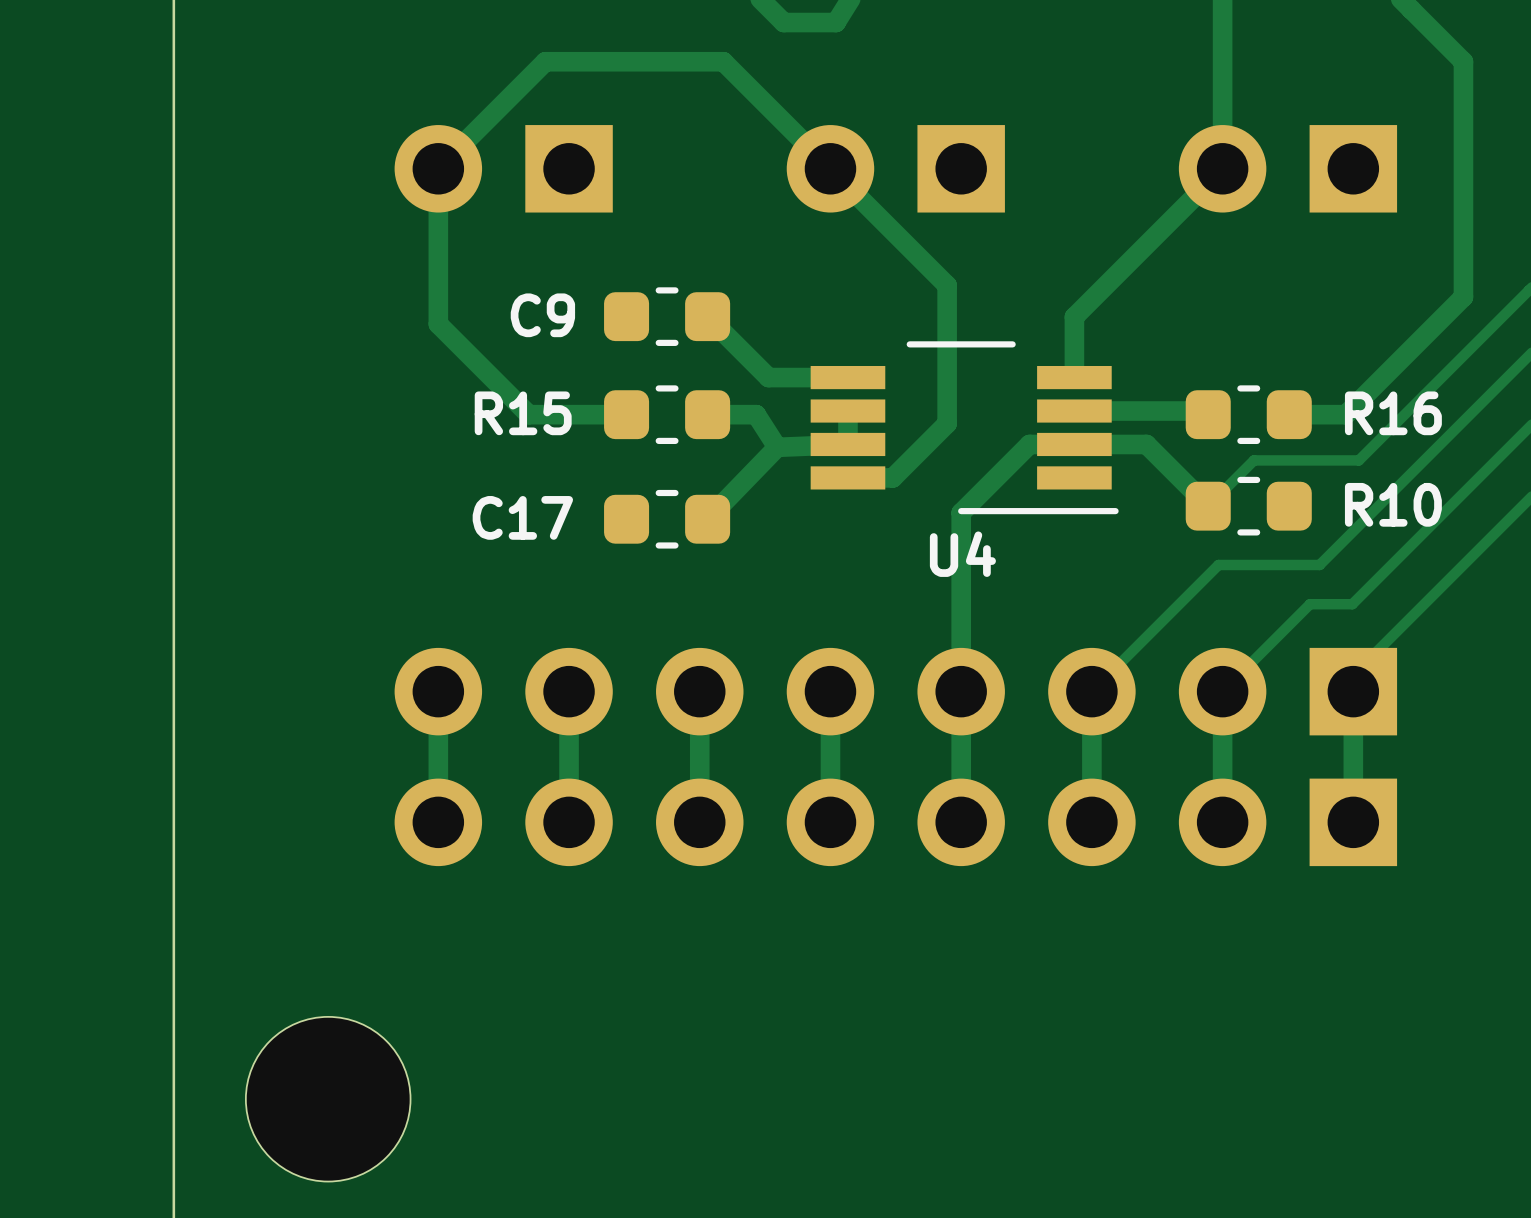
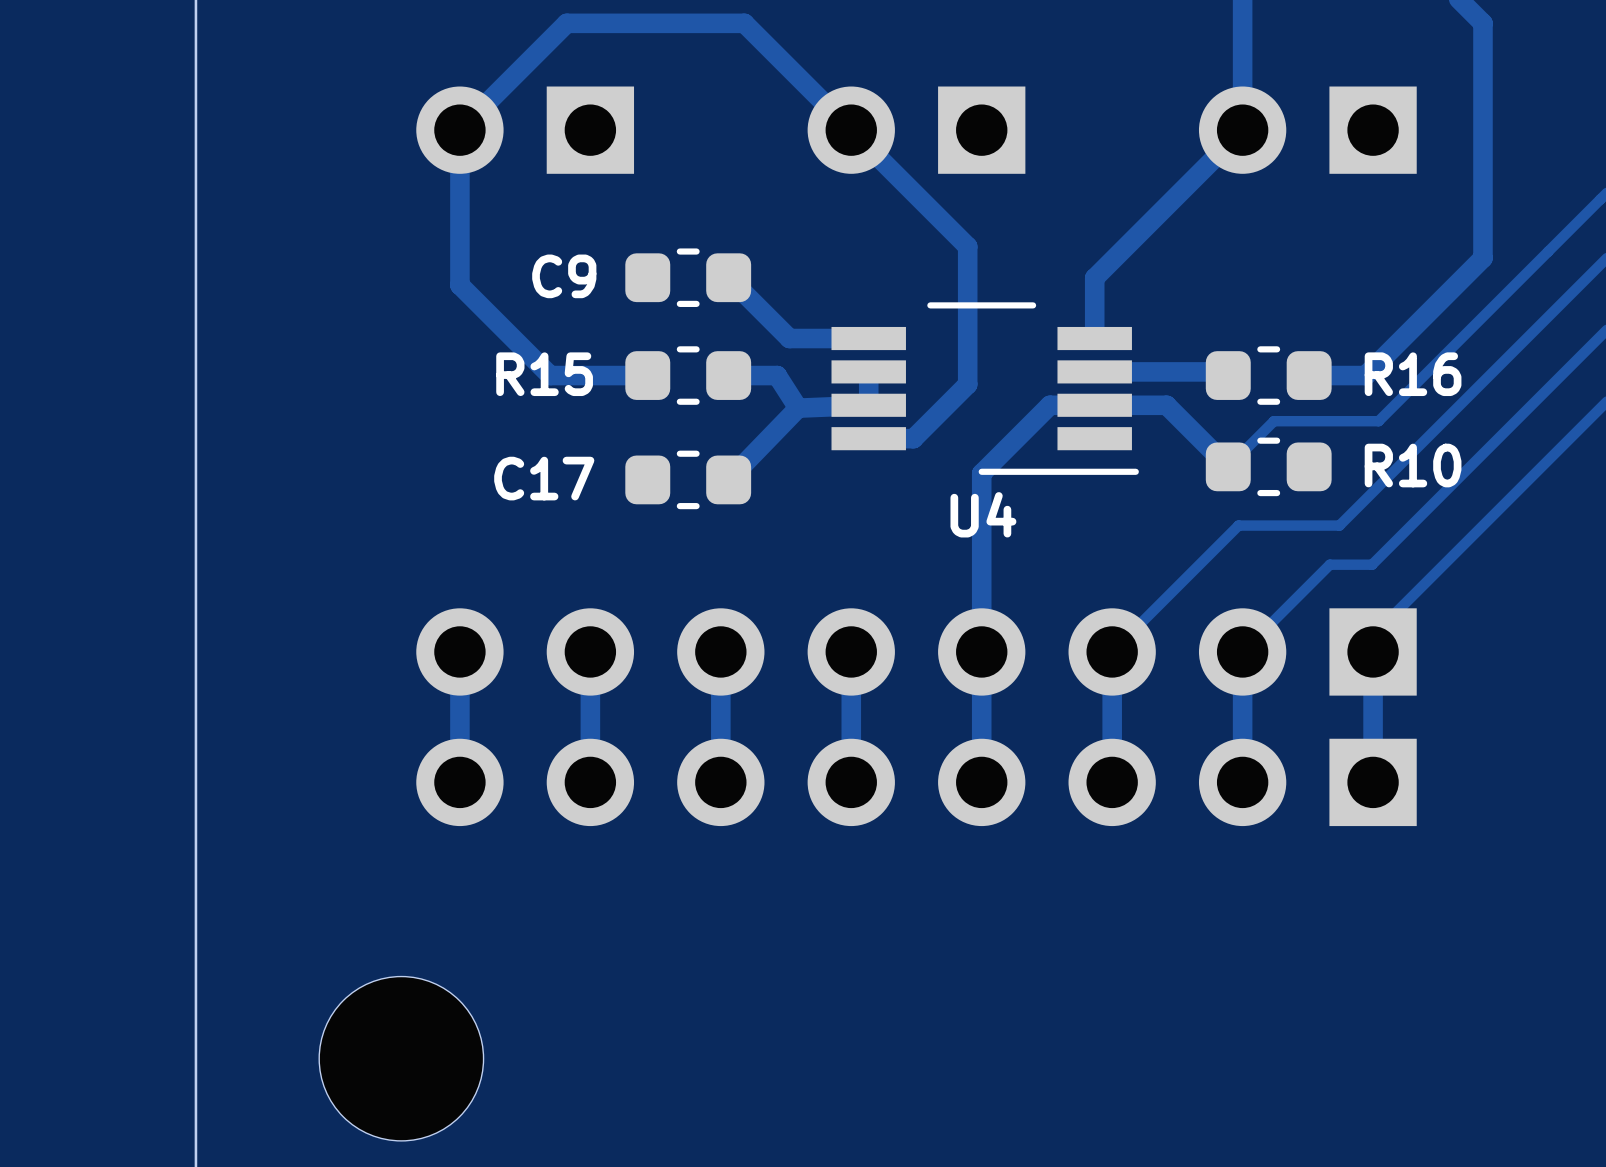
part position: (328, 1099) -> (401, 1058)

